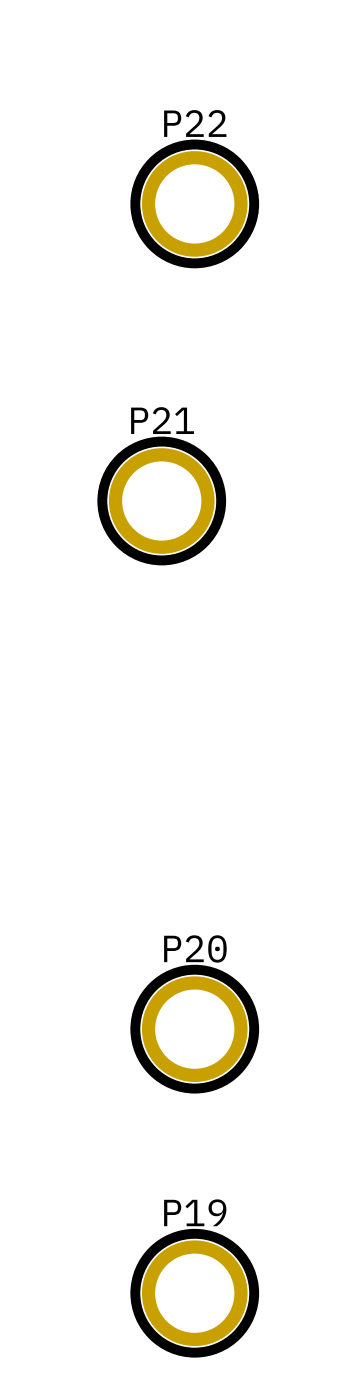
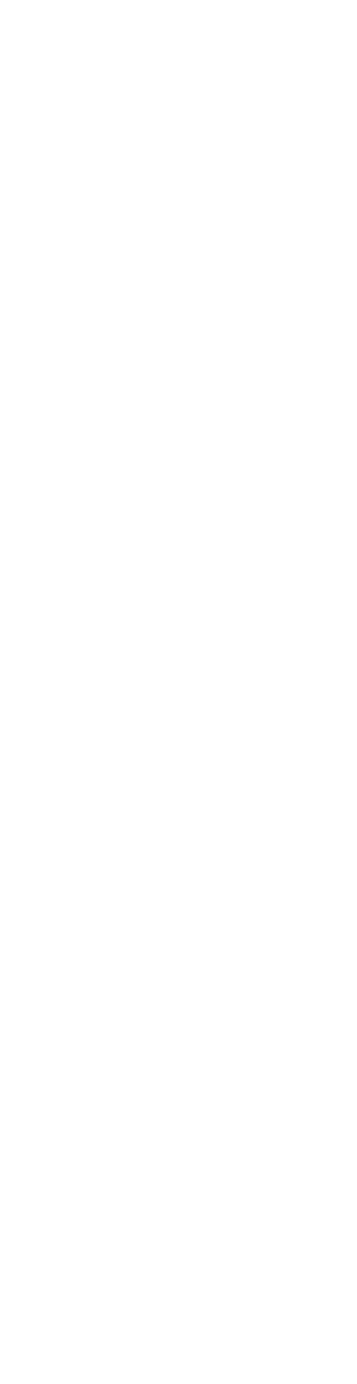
P22: (194, 203) -> none
P21: (161, 501) -> none
P20: (194, 1029) -> none
P19: (194, 1293) -> none

